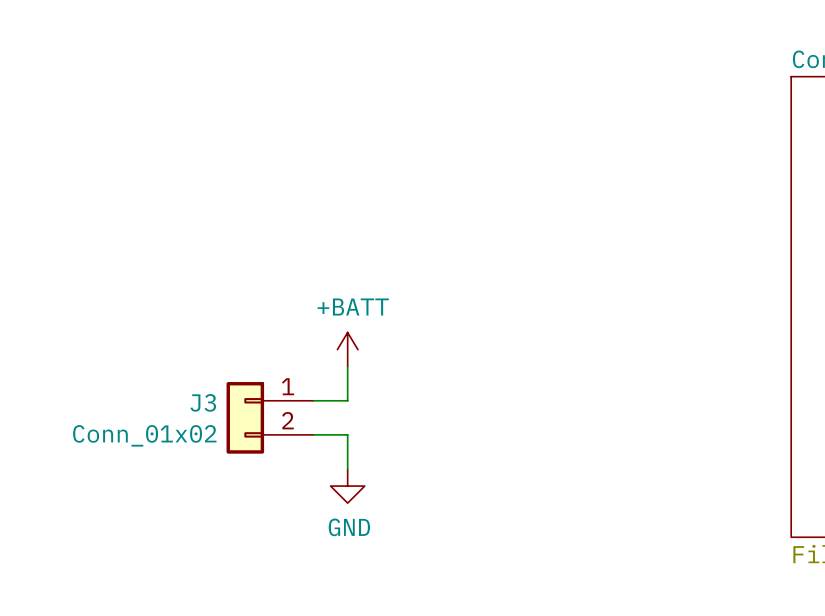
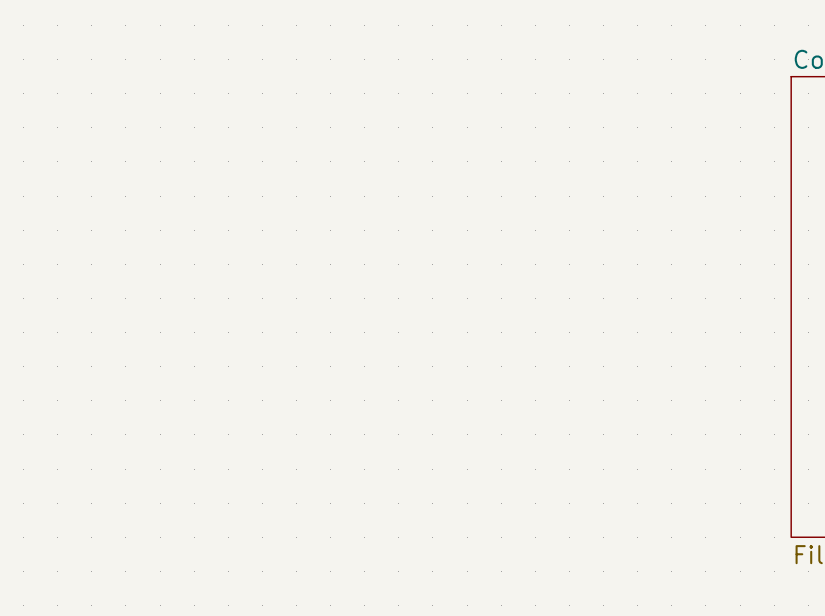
power symbol: +BATT (347, 349) -> none
wire: (347, 366) (347, 400) (313, 400) -> none
J3: Conn_01x02 (270, 417) -> none
wire: (313, 434) (347, 434) (347, 469) -> none
power symbol: GND (347, 486) -> none

